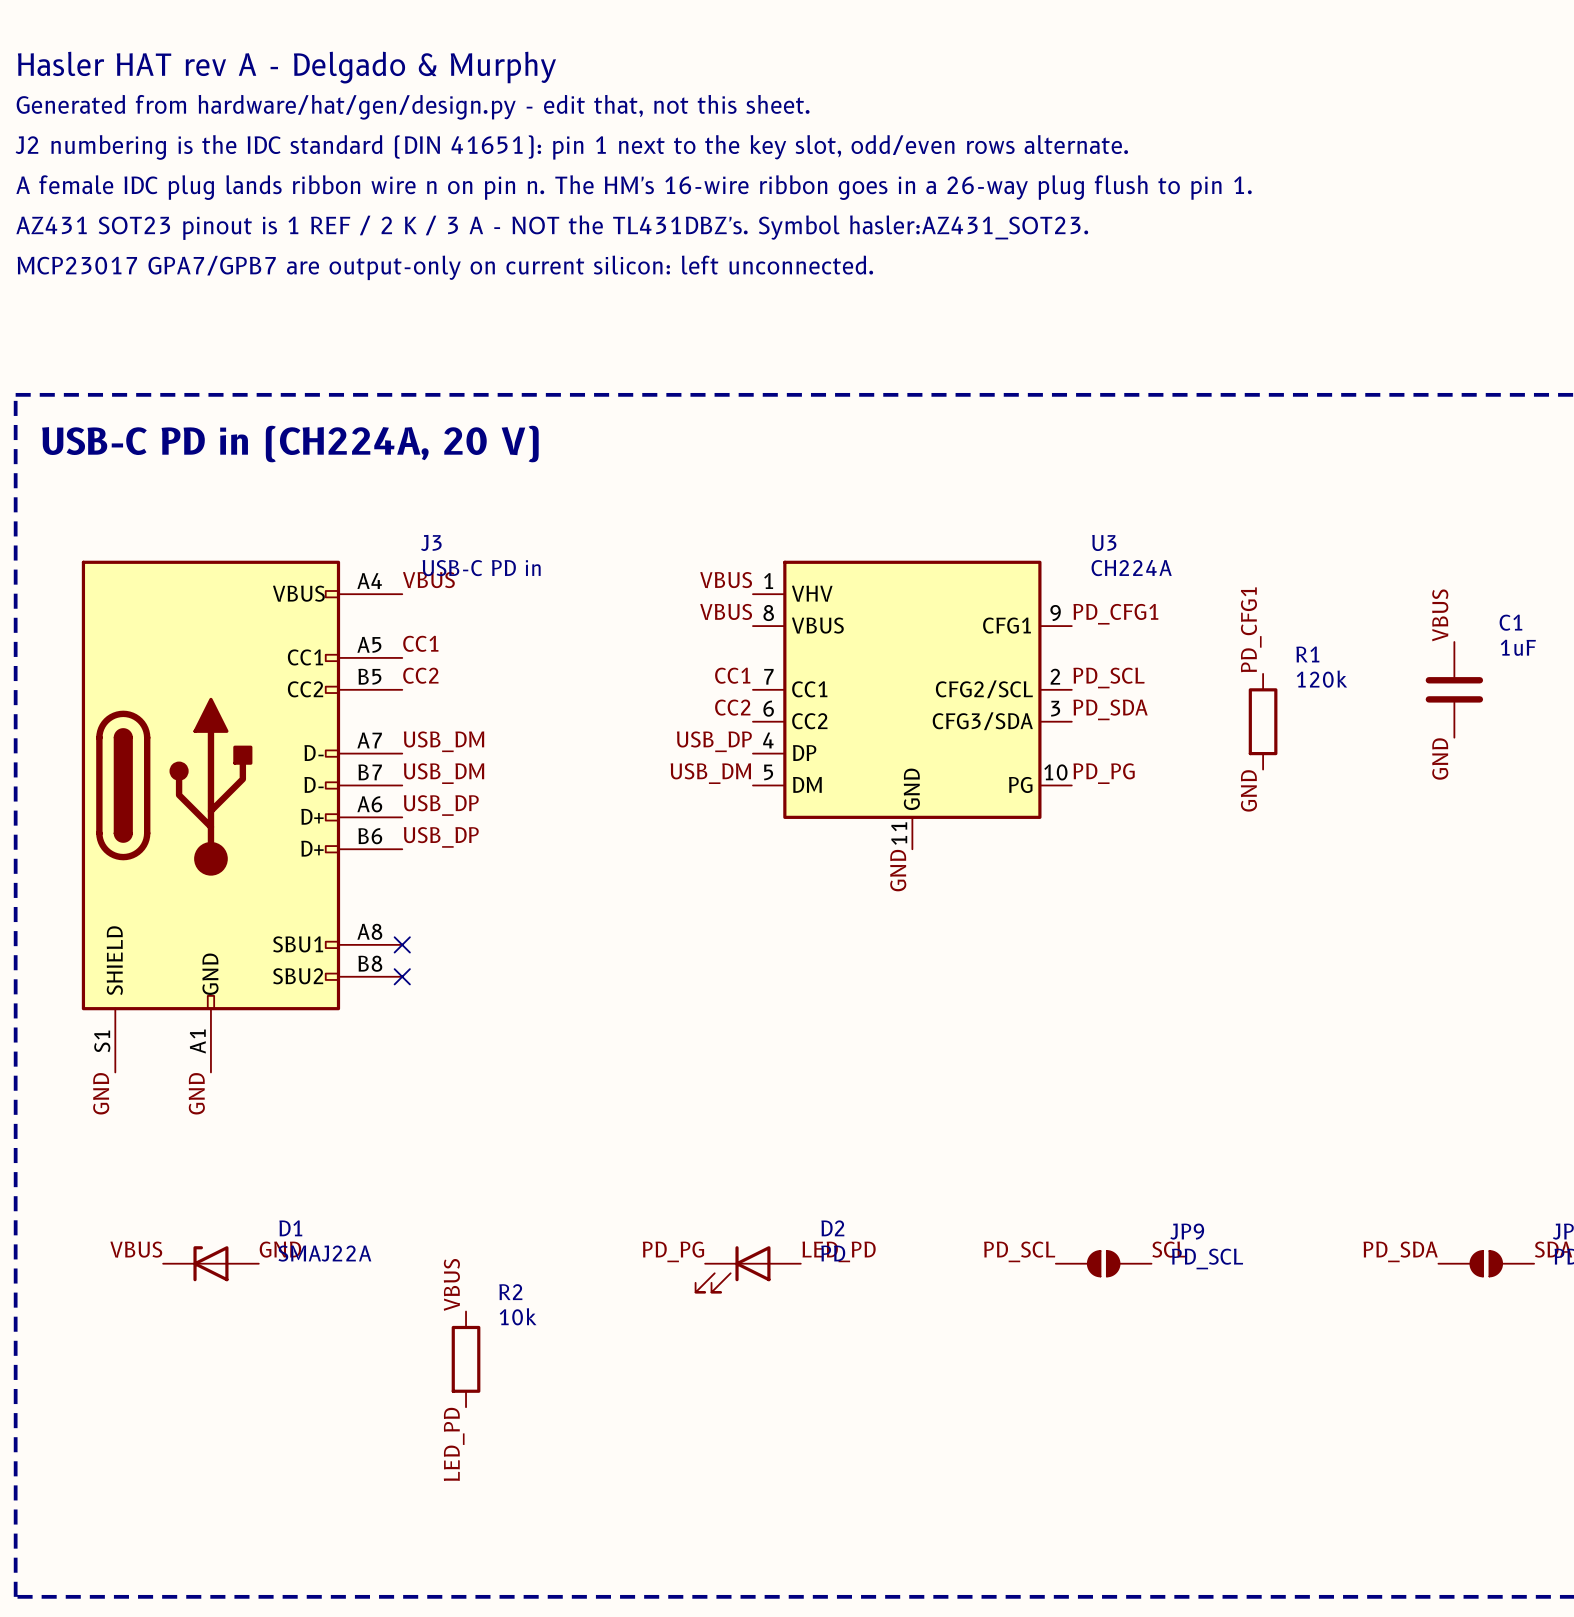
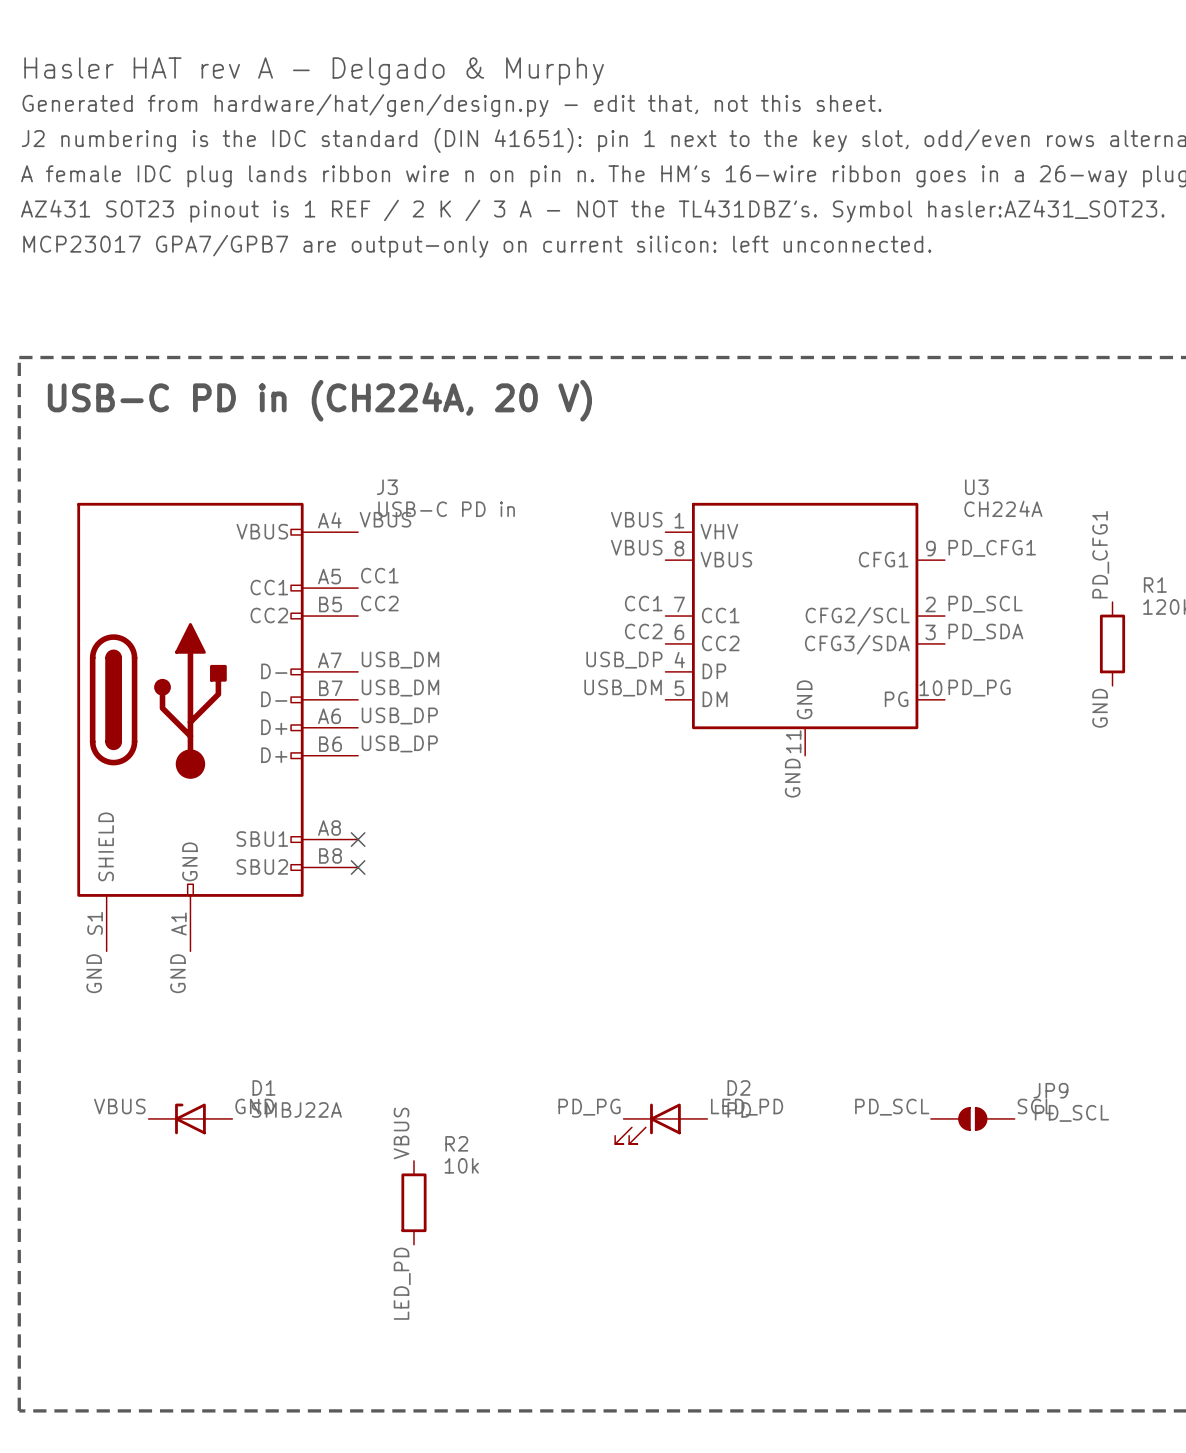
D1 value: SMAJ22A (324, 1253) -> SMBJ22A (296, 1109)

